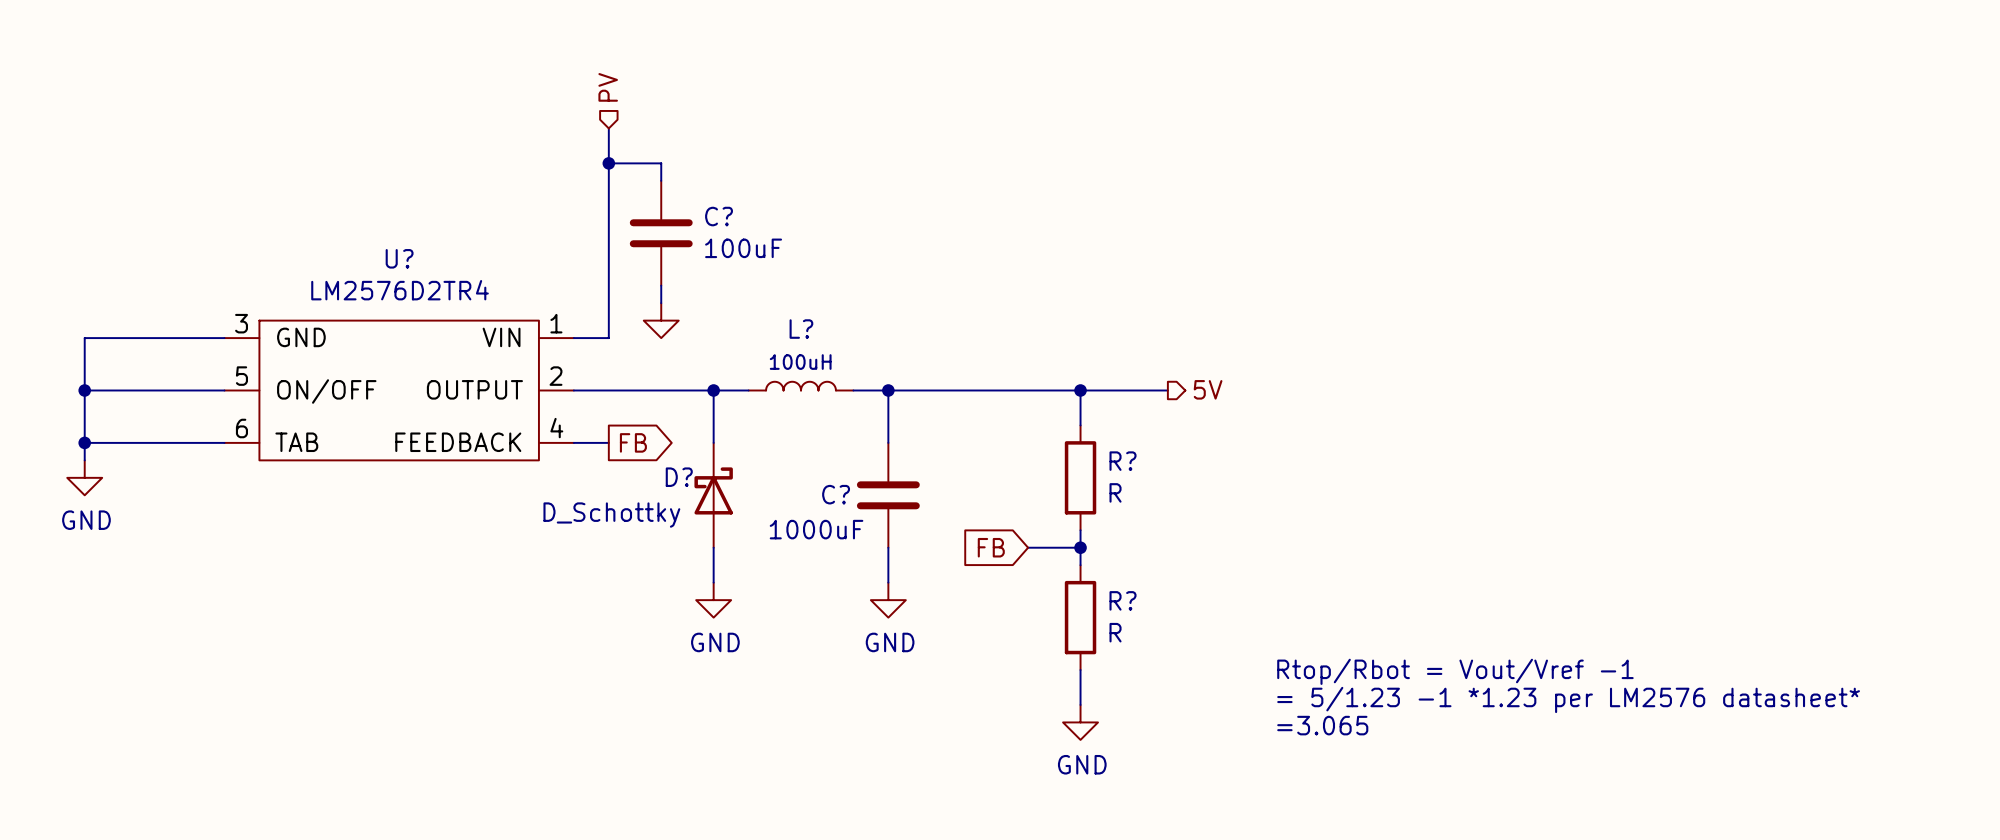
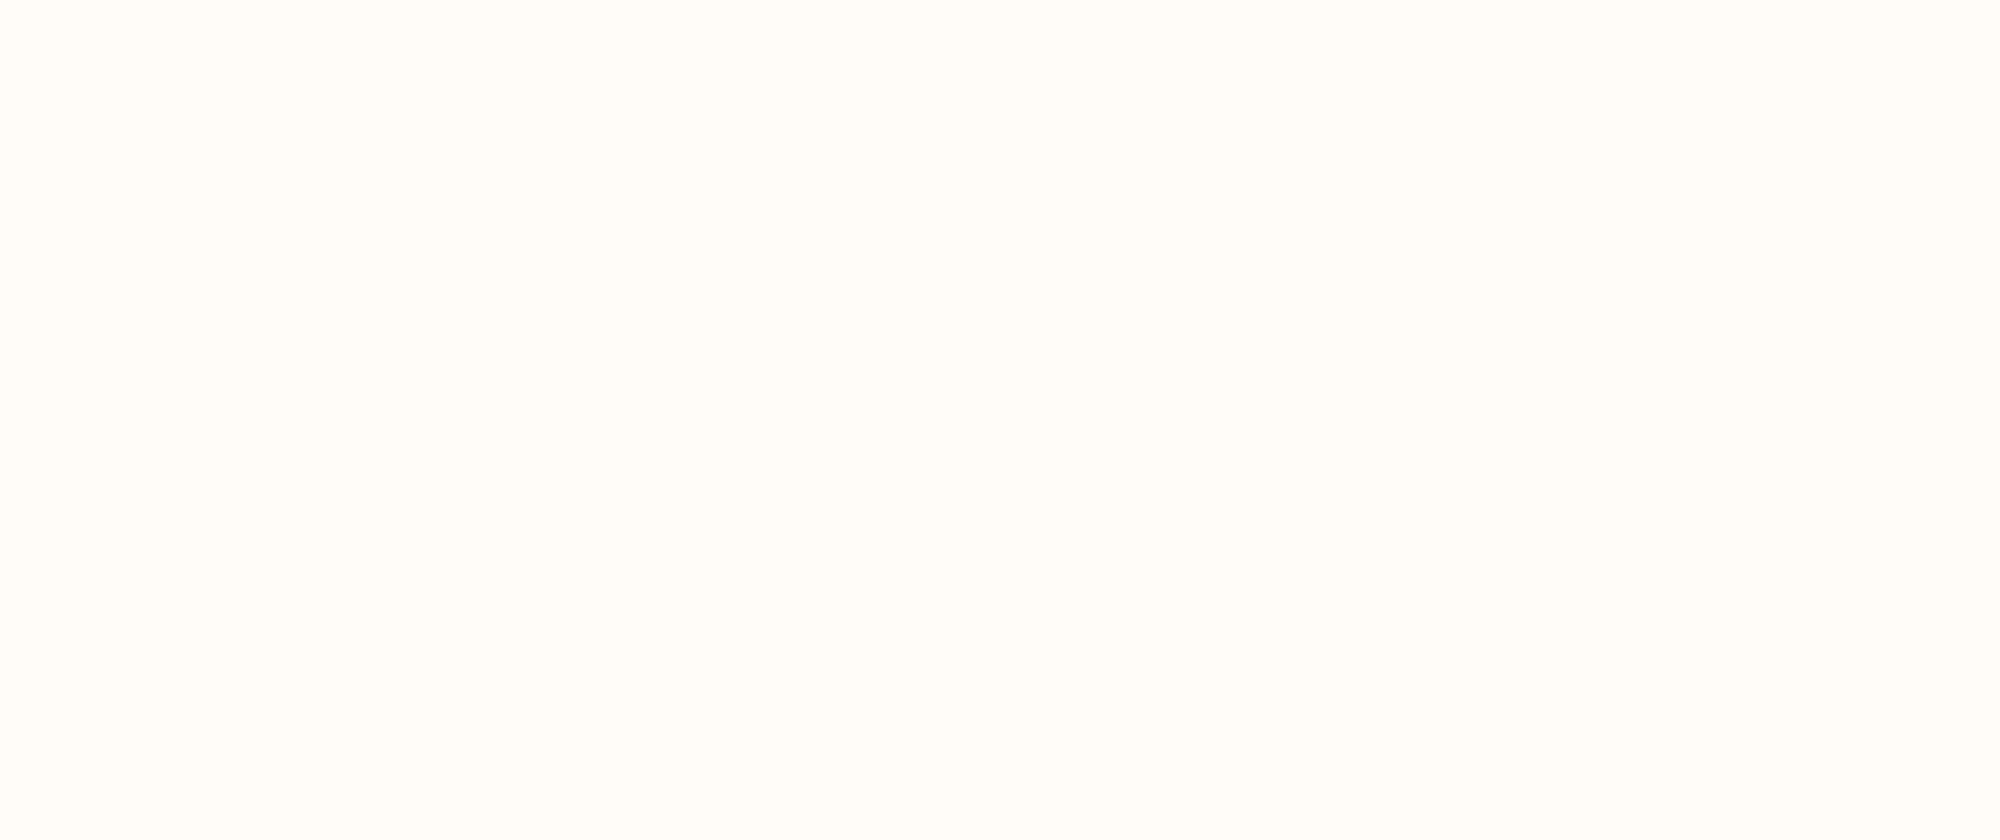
hierarchical label: PV (608, 87) -> none
wire: (608, 128) (608, 338) (573, 338) -> none
wire: (608, 163) (661, 163) (661, 180) -> none
junction: (608, 163) -> none
C?: 100uF (661, 233) -> none
wire: (661, 285) (661, 303) -> none
power symbol: (661, 320) -> none
wire: (224, 338) (84, 338) (84, 460) -> none
L?: 100uH (801, 386) -> none
hierarchical label: 5V (1208, 389) -> none
wire: (84, 390) (224, 390) -> none
junction: (84, 390) -> none
U?: LM2576D2TR4 (399, 390) -> none
wire: (573, 390) (748, 390) -> none
wire: (713, 390) (713, 442) -> none
junction: (713, 390) -> none
wire: (853, 390) (1167, 390) -> none
wire: (888, 390) (888, 442) -> none
junction: (888, 390) -> none
wire: (1080, 390) (1080, 425) -> none
junction: (1080, 390) -> none
wire: (84, 442) (224, 442) -> none
junction: (84, 442) -> none
wire: (573, 442) (608, 442) -> none
global label: FB (633, 442) -> none
power symbol: GND (84, 477) -> none
R?: R (1080, 477) -> none
D?: D_Schottky (713, 495) -> none
C?: 1000uF (888, 495) -> none
wire: (1080, 530) (1080, 565) -> none
wire: (713, 547) (713, 582) -> none
wire: (888, 547) (888, 582) -> none
global label: FB (991, 547) -> none
wire: (1028, 547) (1080, 547) -> none
junction: (1080, 547) -> none
power symbol: GND (713, 600) -> none
power symbol: GND (888, 600) -> none
R?: R (1080, 617) -> none
wire: (1080, 670) (1080, 704) -> none
text: Rtop/Rbot = Vout/Vref -1 (1455, 671) -> none
text: = 5/1.23 -1 *1.23 per LM2576 datasheet* (1568, 699) -> none
power symbol: GND (1080, 722) -> none
text: =3.065 (1322, 725) -> none

